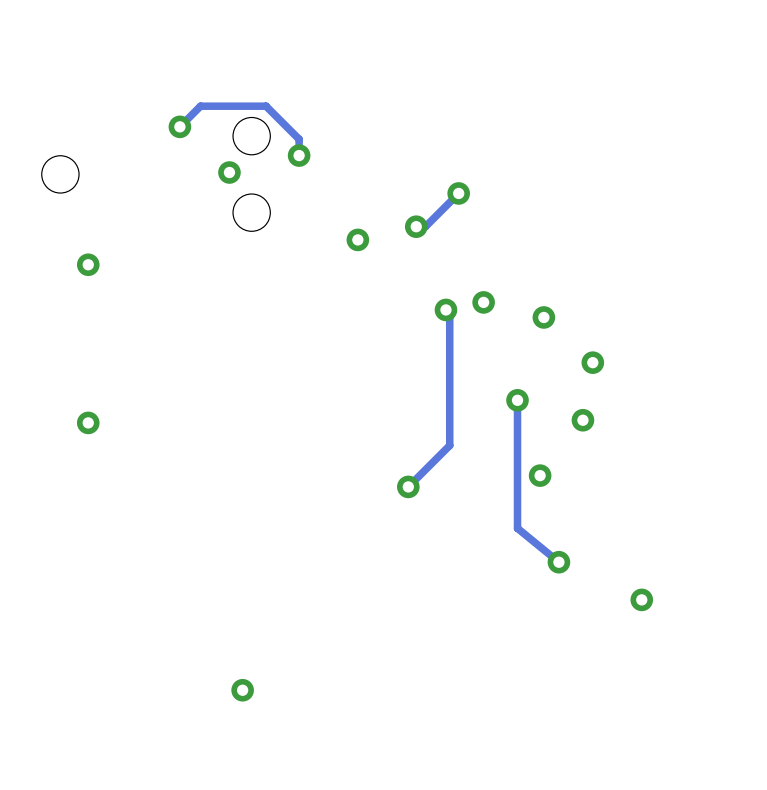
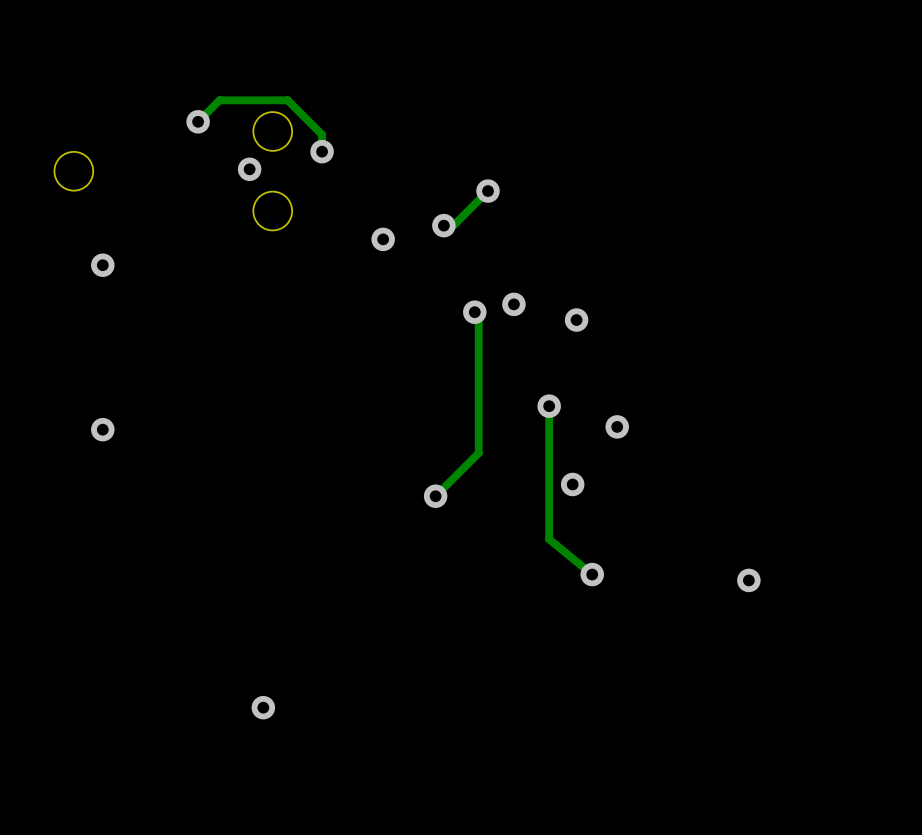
via: (592, 362) -> none
via position: (641, 599) -> (748, 580)

